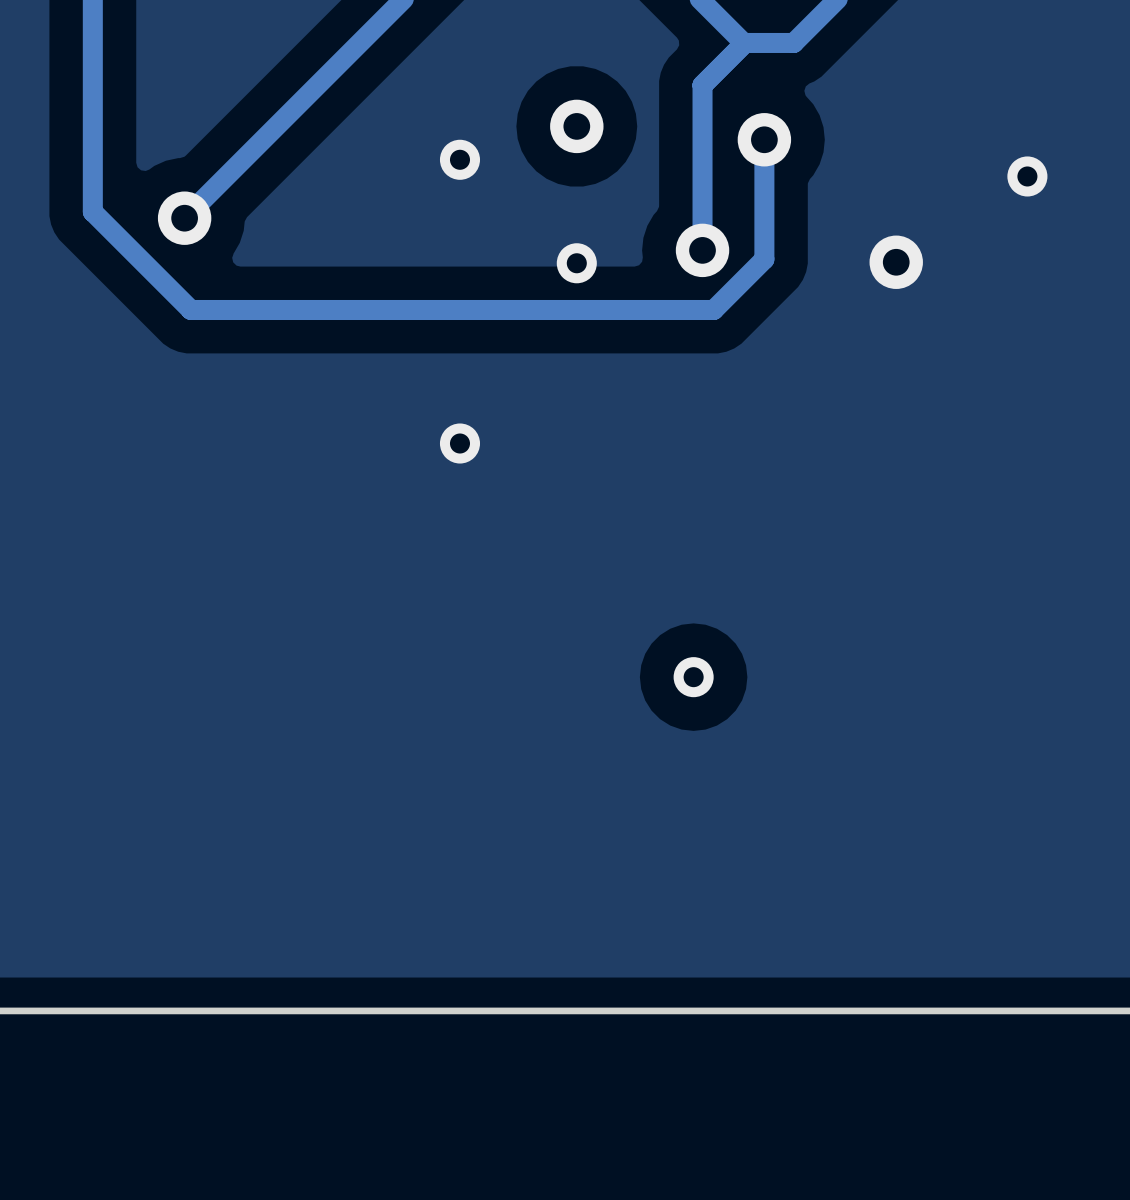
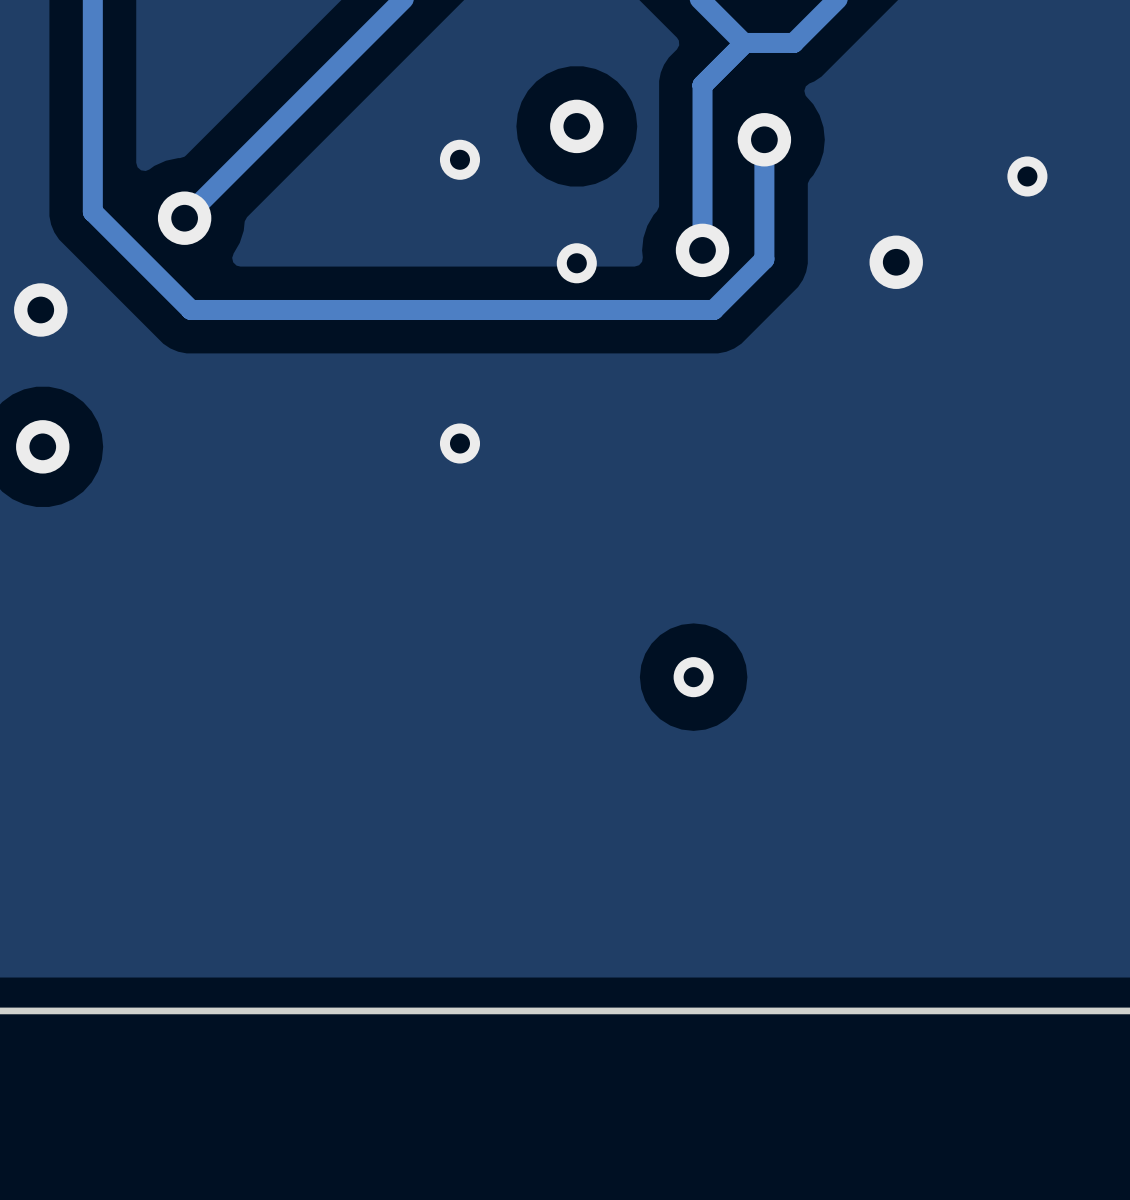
via: none -> (40, 309)
via: none -> (42, 446)

